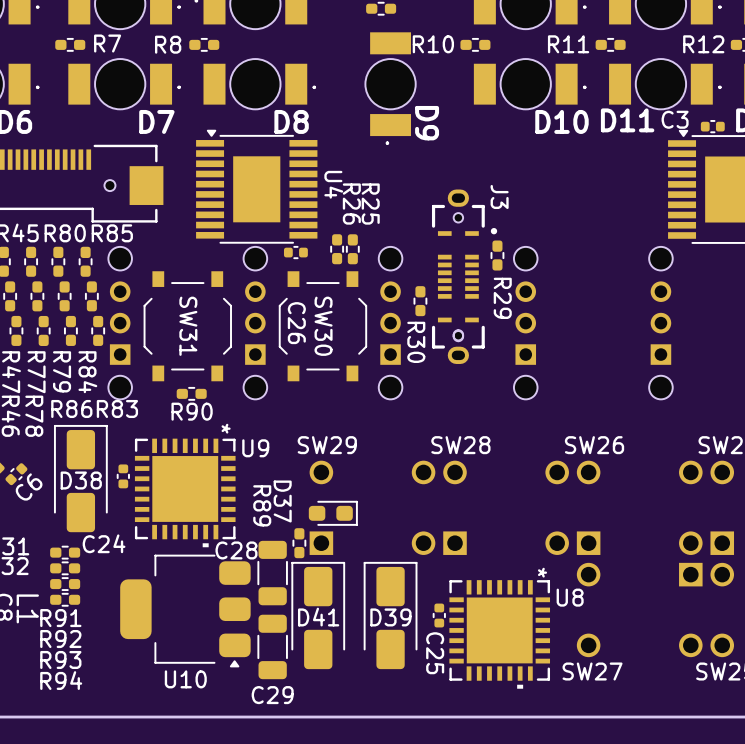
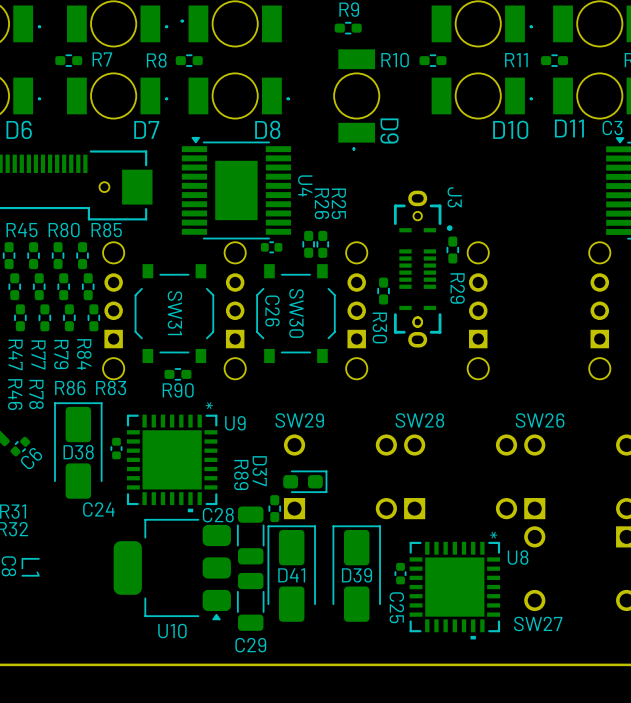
R91: (65, 552) -> none
R92: (65, 568) -> none
R93: (65, 584) -> none
R94: (65, 599) -> none

